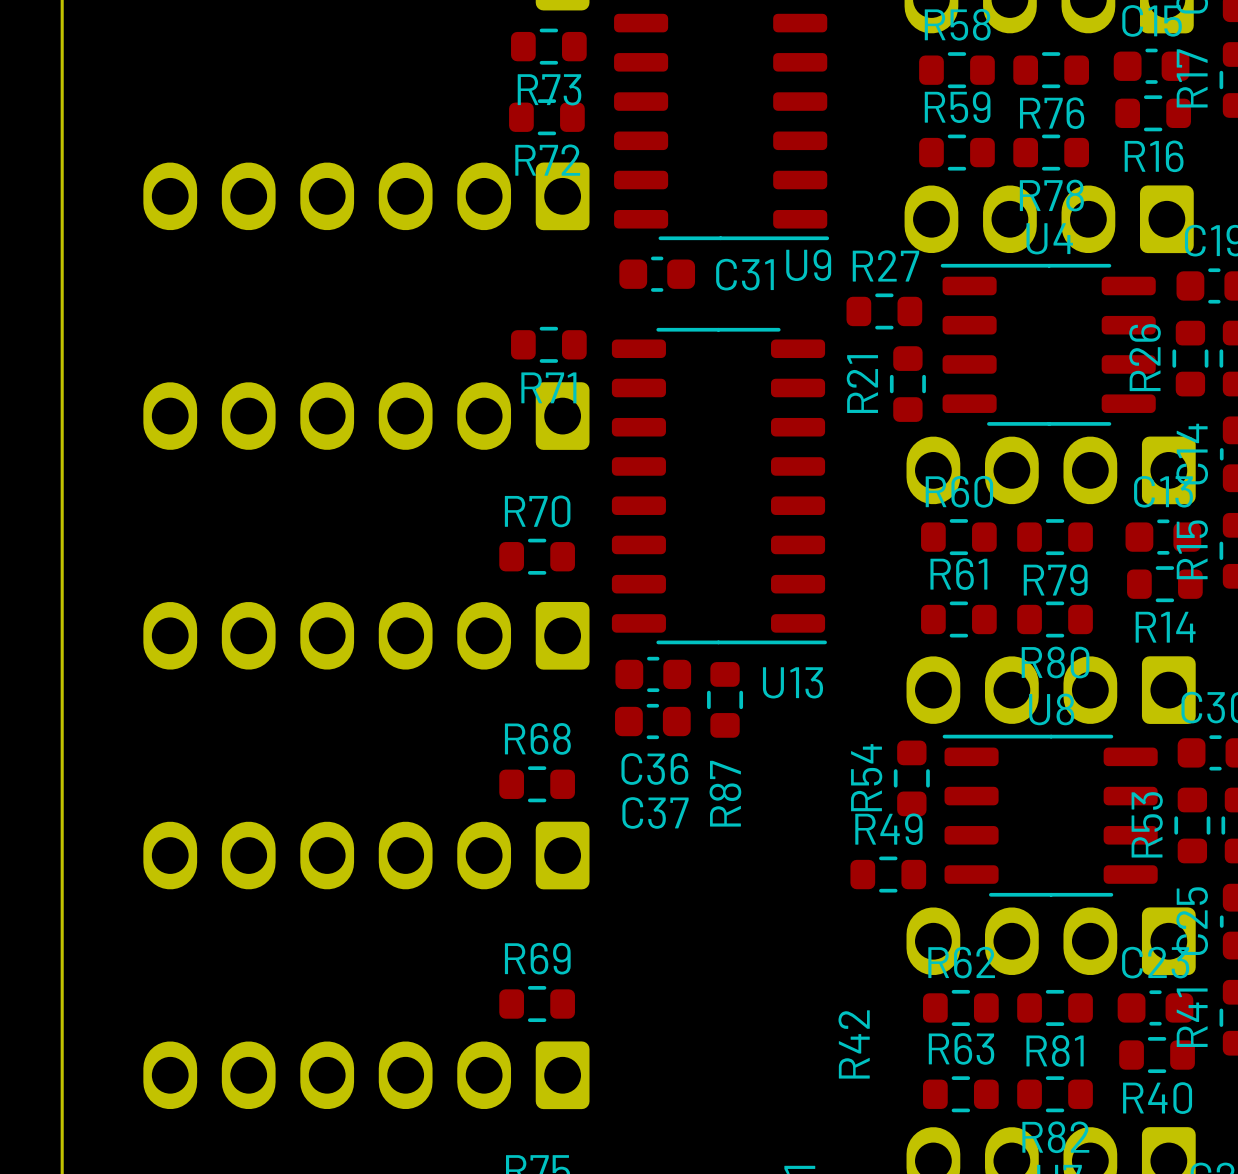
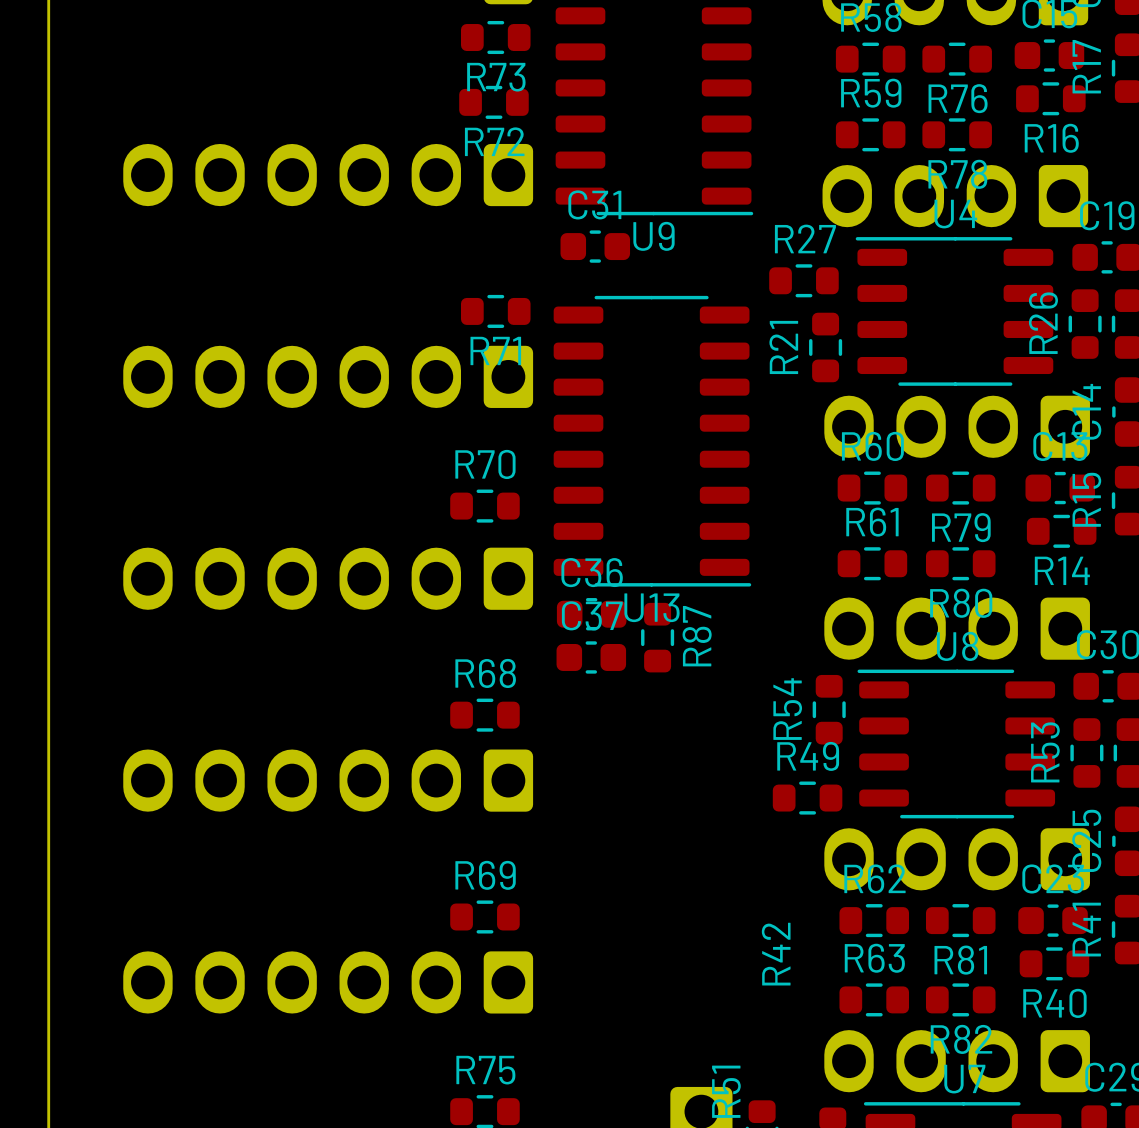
U9 name position: U9 (808, 265) -> U9 (653, 236)
C31 name position: C31 (744, 274) -> C31 (594, 204)
U13 name position: U13 (792, 682) -> U13 (652, 607)
C36 name position: C36 (654, 769) -> C36 (592, 572)
R87 name position: R87 (725, 793) -> R87 (697, 636)
C37 name position: C37 (655, 812) -> C37 (592, 615)

